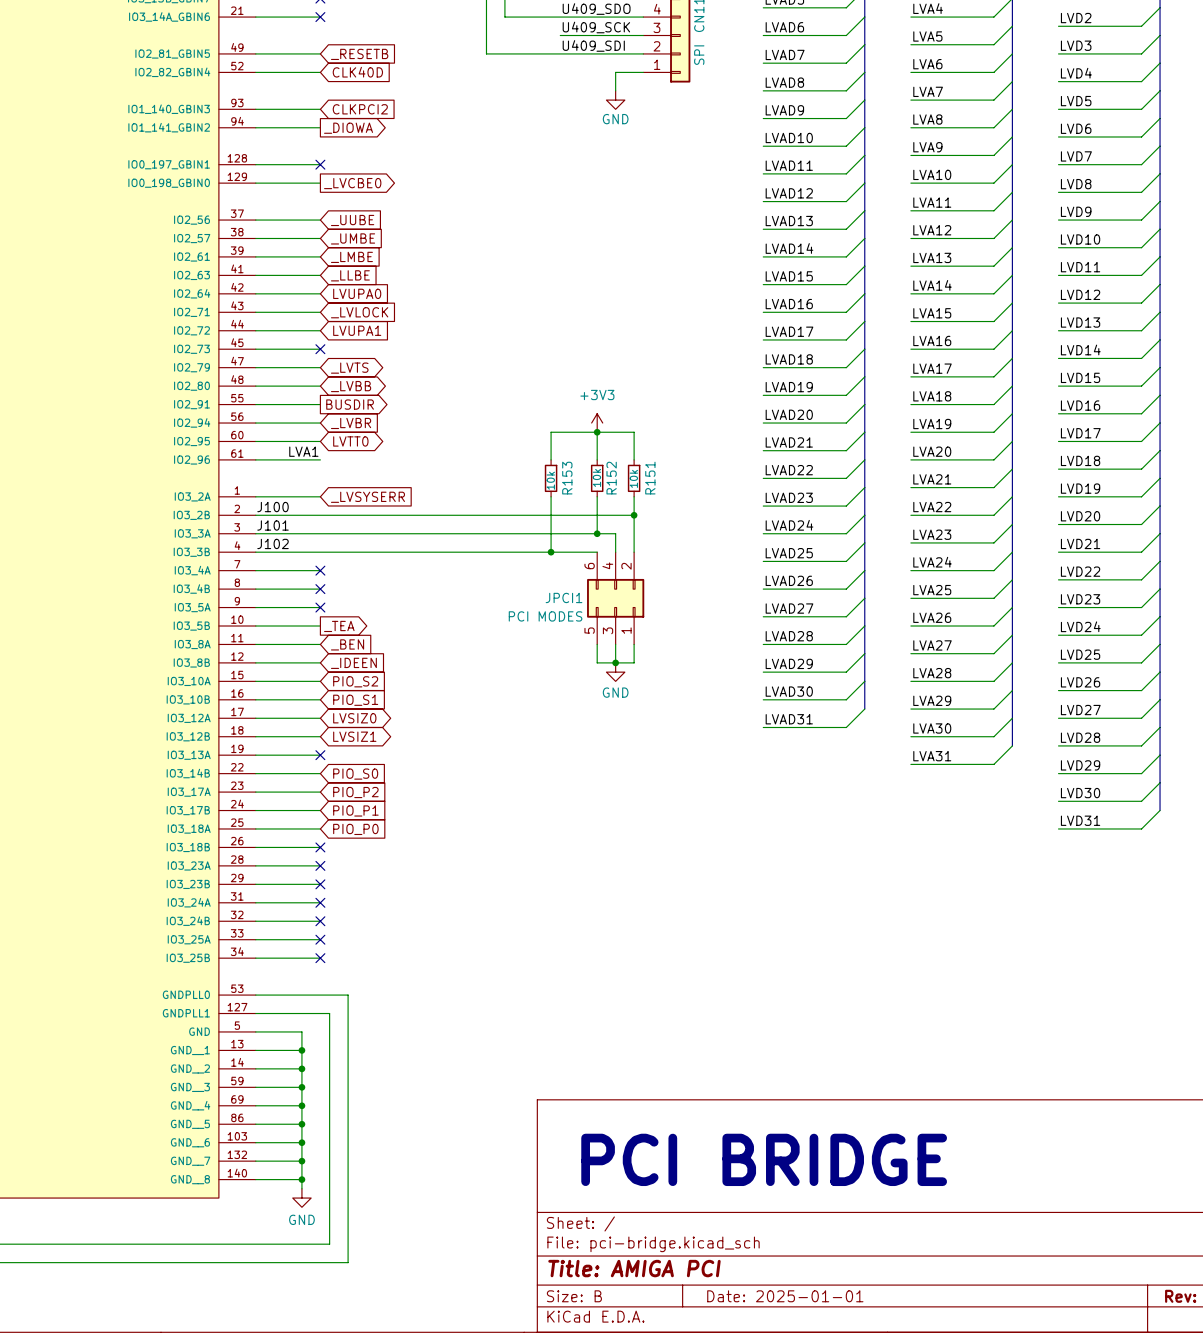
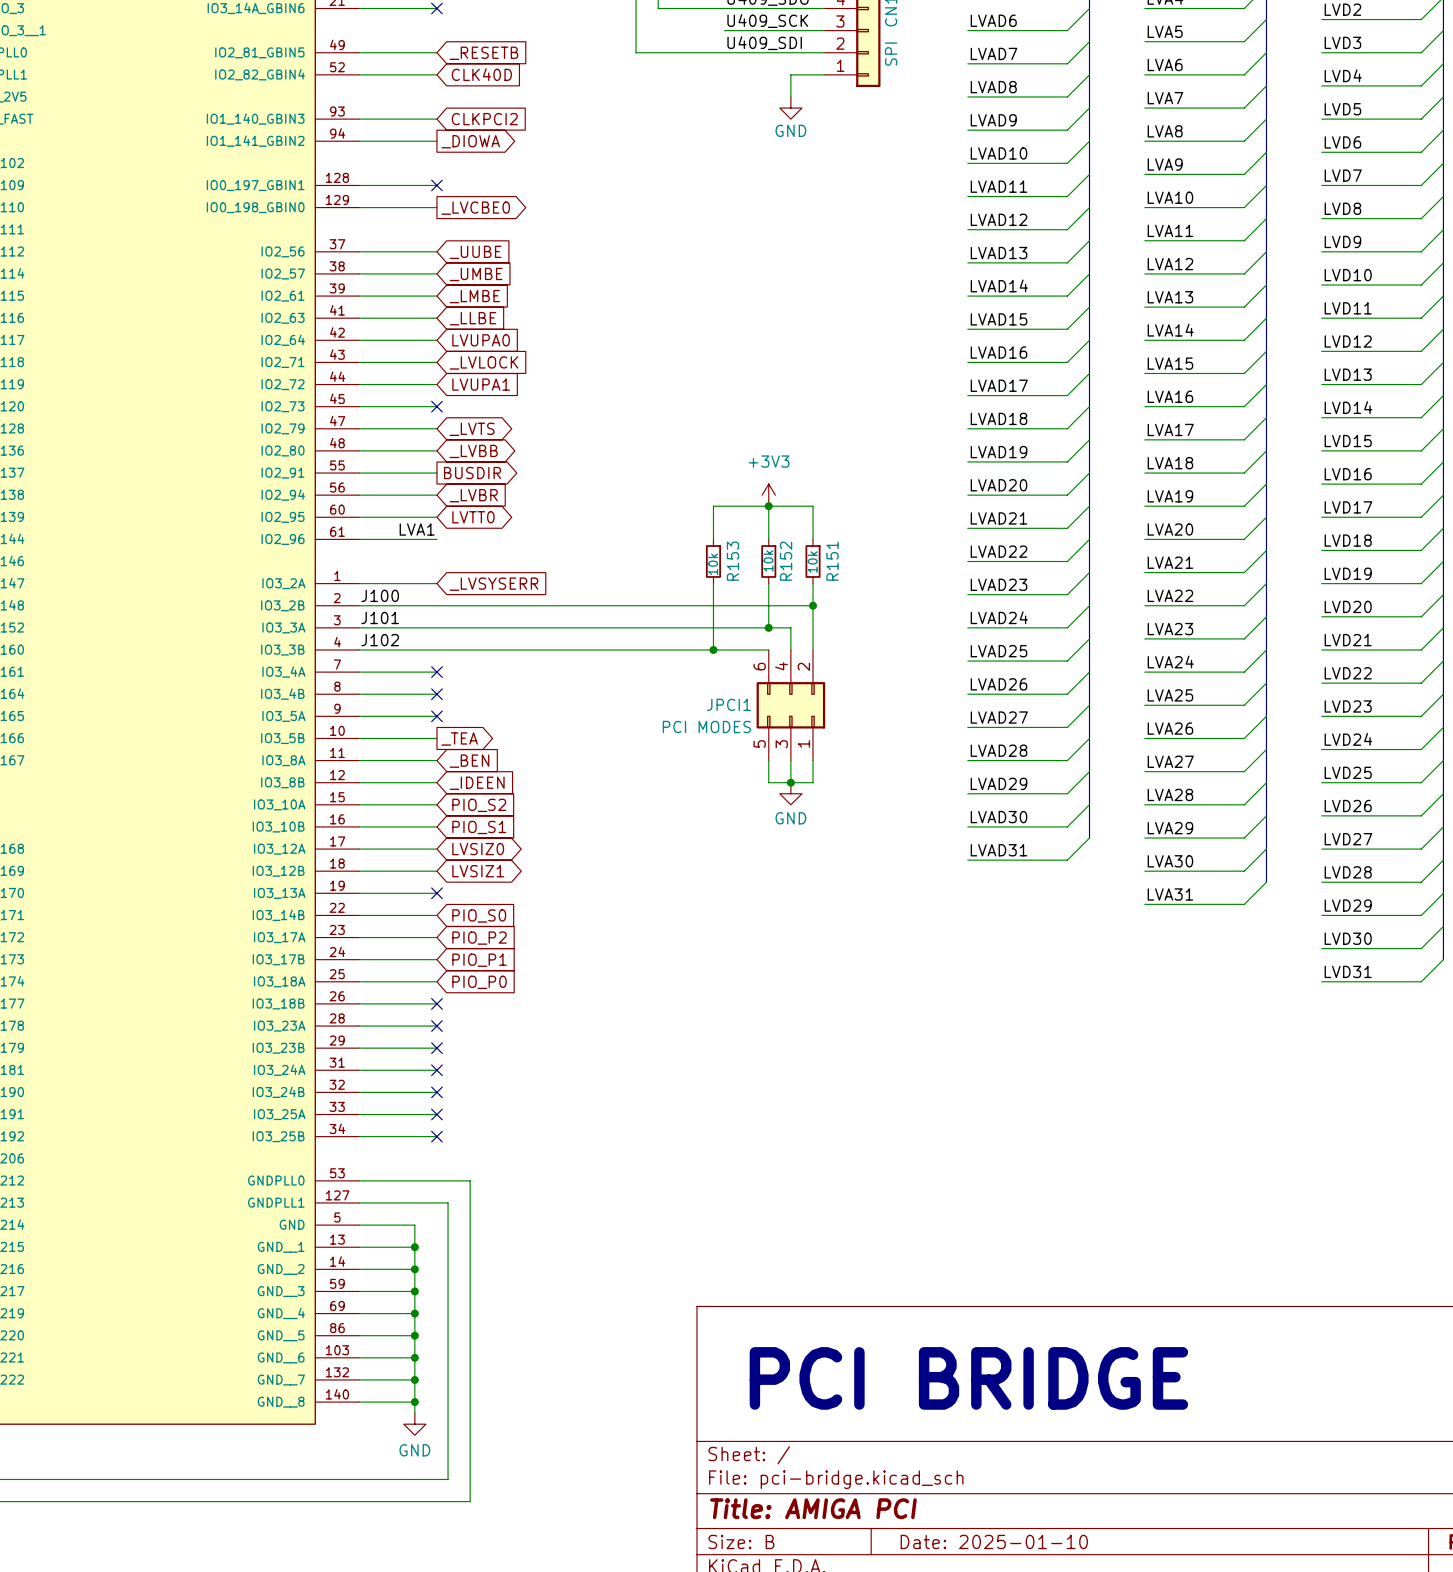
title block: Date: 2025-01-01 (785, 1296) -> Date: 2025-01-10 (994, 1541)

